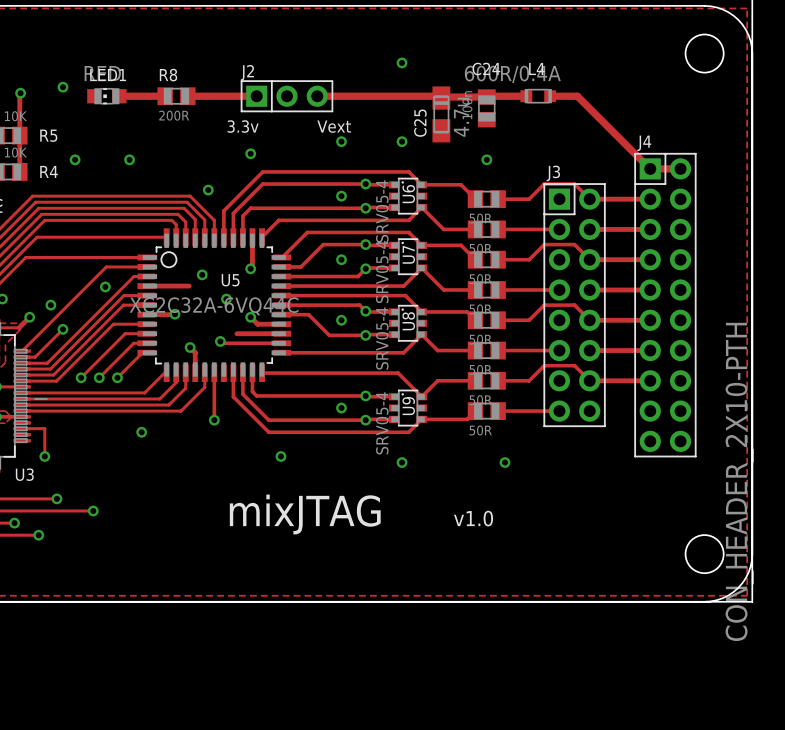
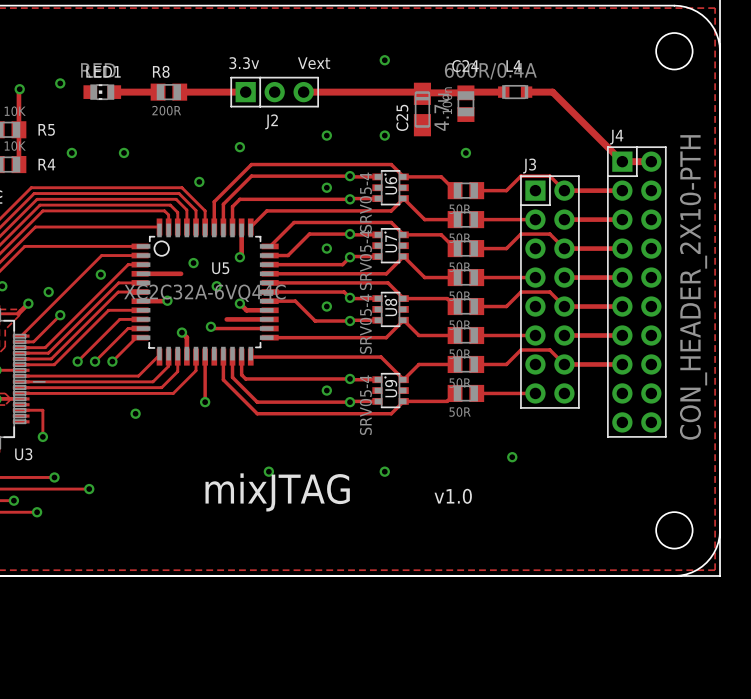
J2 name position: J2 (247, 72) -> J2 (271, 121)
text position: 3.3v (243, 126) -> 3.3v (244, 63)
text position: Vext (334, 126) -> Vext (314, 63)
via position: (280, 456) -> (268, 471)
via position: (402, 462) -> (384, 471)
via position: (504, 462) -> (512, 457)
J4 value position: CON_HEADER_2X10-PTH (739, 481) -> CON_HEADER_2X10-PTH (693, 287)
text position: mixJTAG (305, 514) -> mixJTAG (277, 492)

